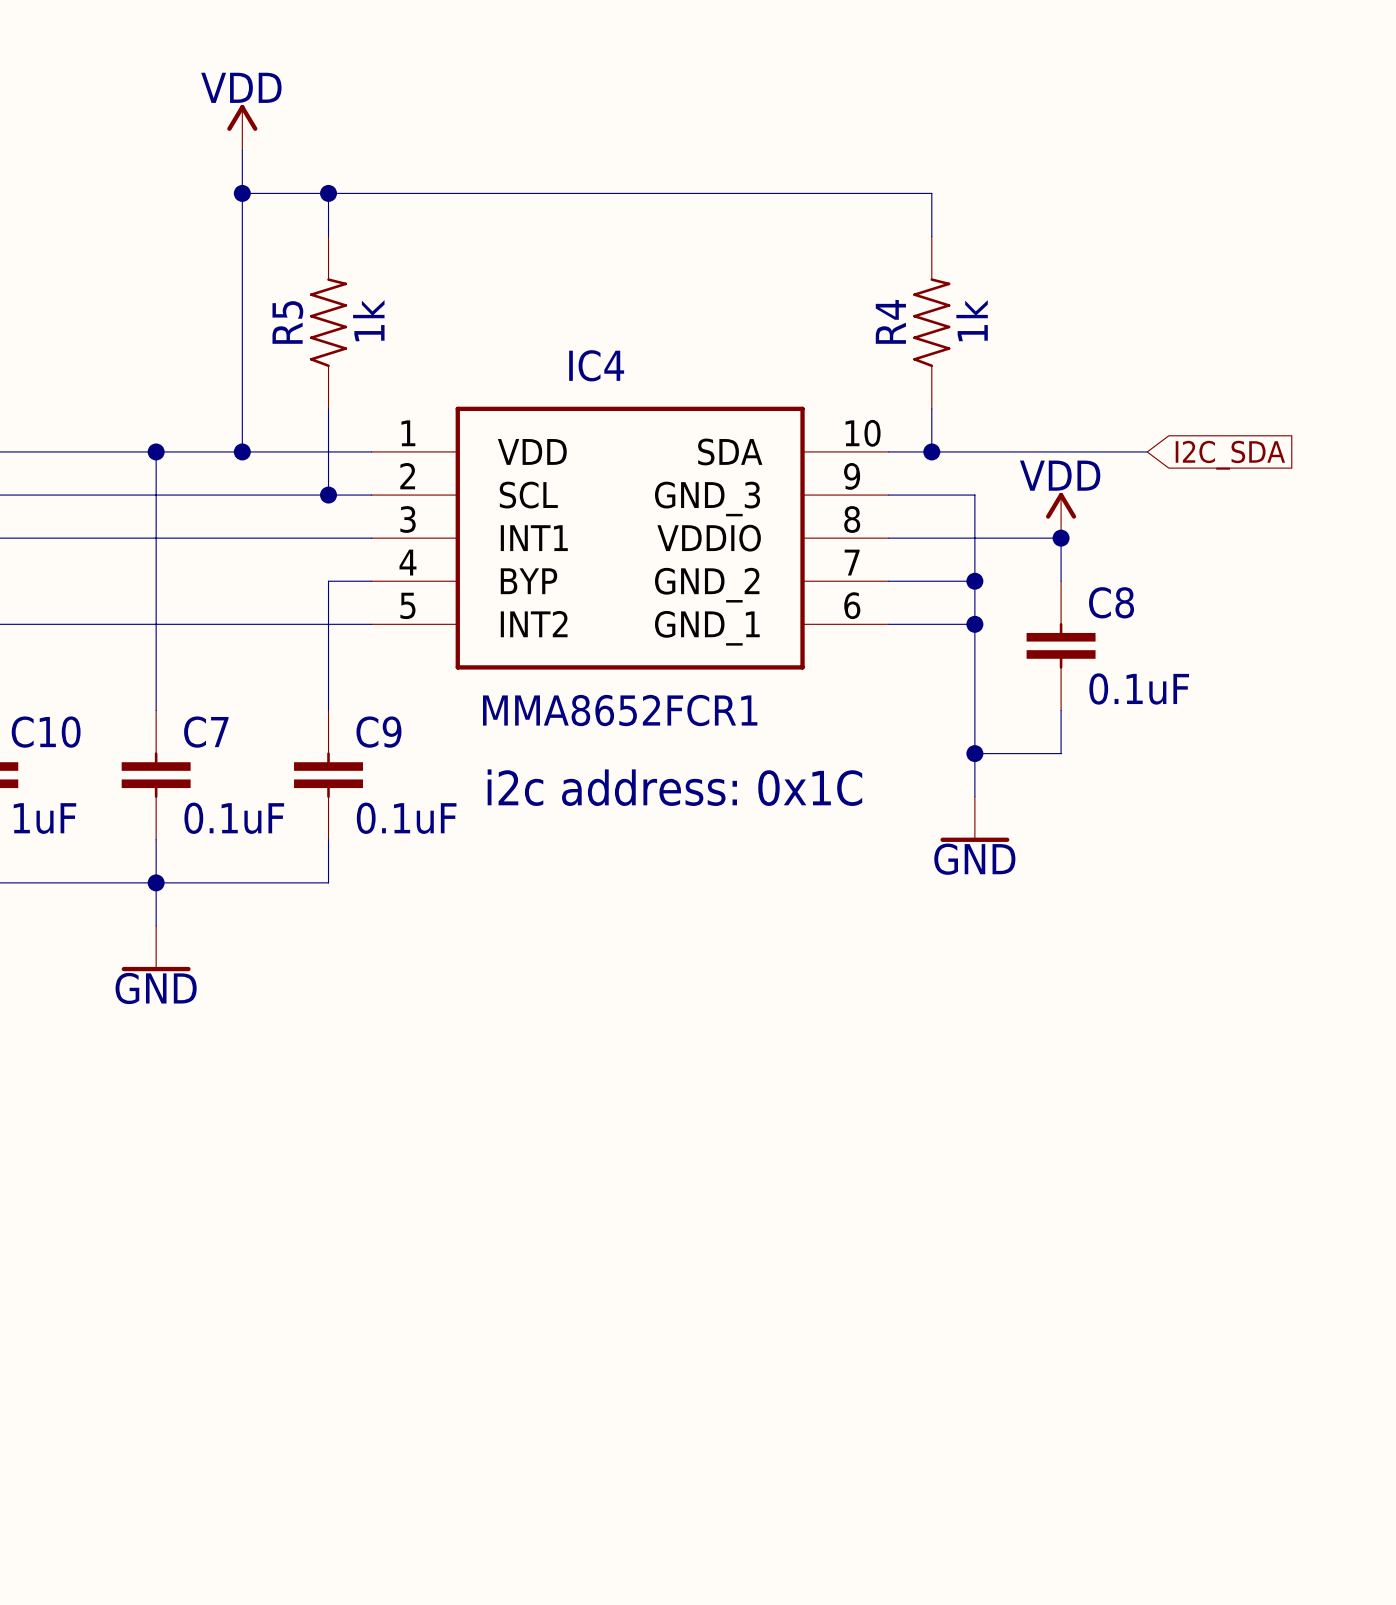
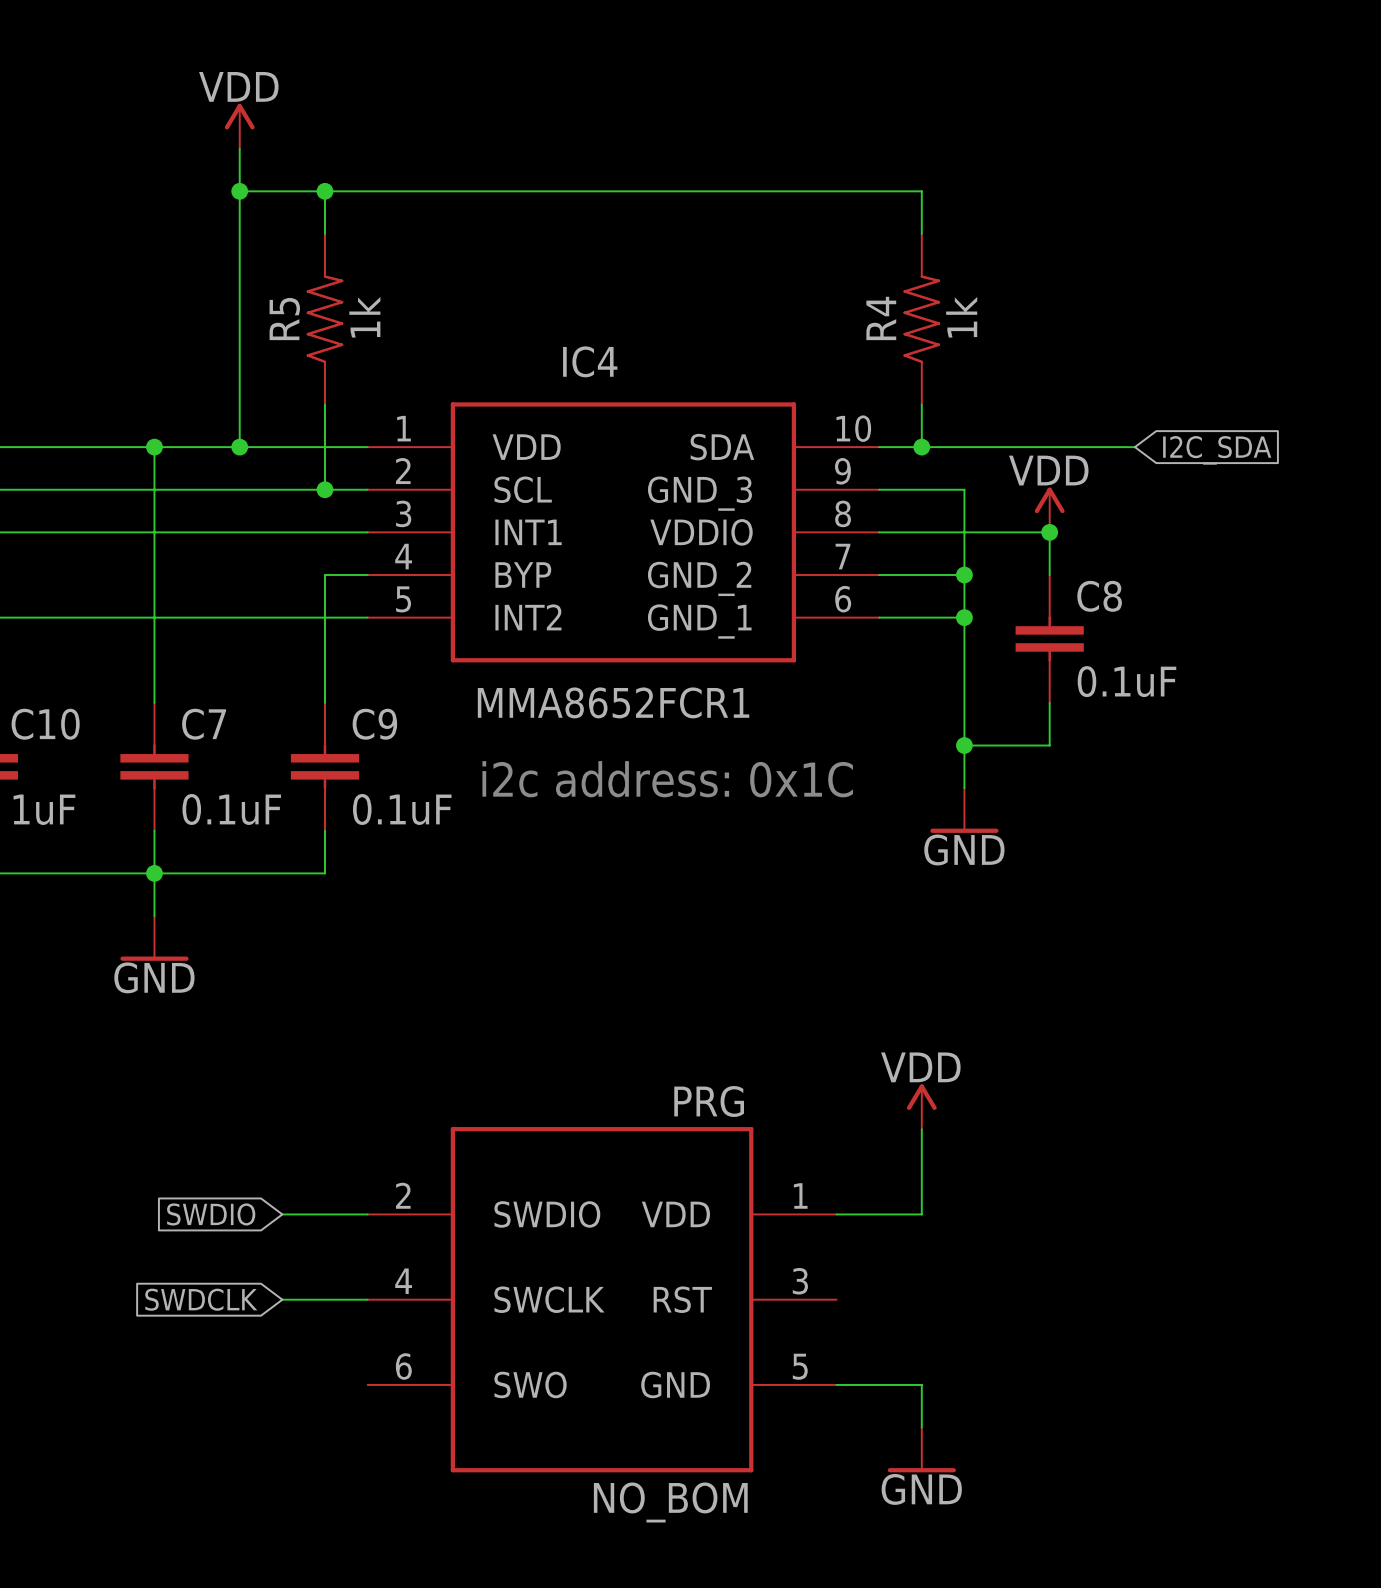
power symbol: none -> VDD (921, 1106)
wire: none -> (921, 1129) (921, 1214) (836, 1214)
global label: none -> SWDIO (211, 1214)
wire: none -> (282, 1214) (367, 1214)
global label: none -> SWDCLK (201, 1299)
wire: none -> (282, 1299) (367, 1299)
PRG: none -> NO_BOM (602, 1299)
wire: none -> (836, 1384) (921, 1384) (921, 1427)
power symbol: none -> GND (921, 1449)

